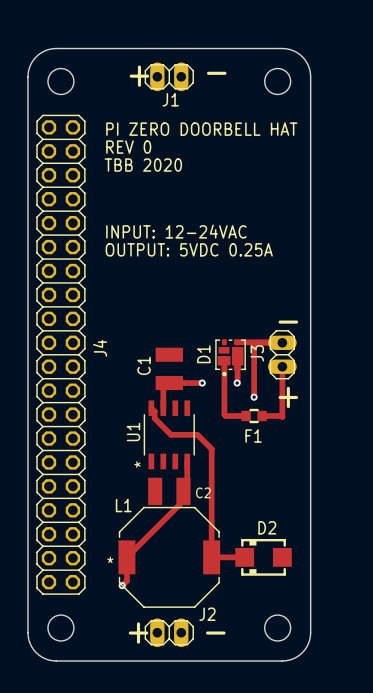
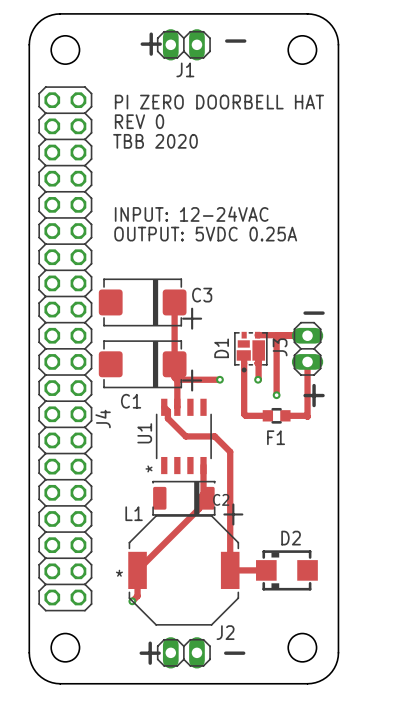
C3: none -> (142, 302)
track: none -> (174, 302) (174, 377) (176, 379)
C1 footprint: [155, 347, 183, 391] -> [98, 340, 187, 389]
J4 name position: J4 (100, 348) -> J4 (103, 419)
C1 name position: C1 (144, 365) -> C1 (131, 401)
C2 footprint: [148, 477, 191, 506] -> [152, 480, 216, 516]

